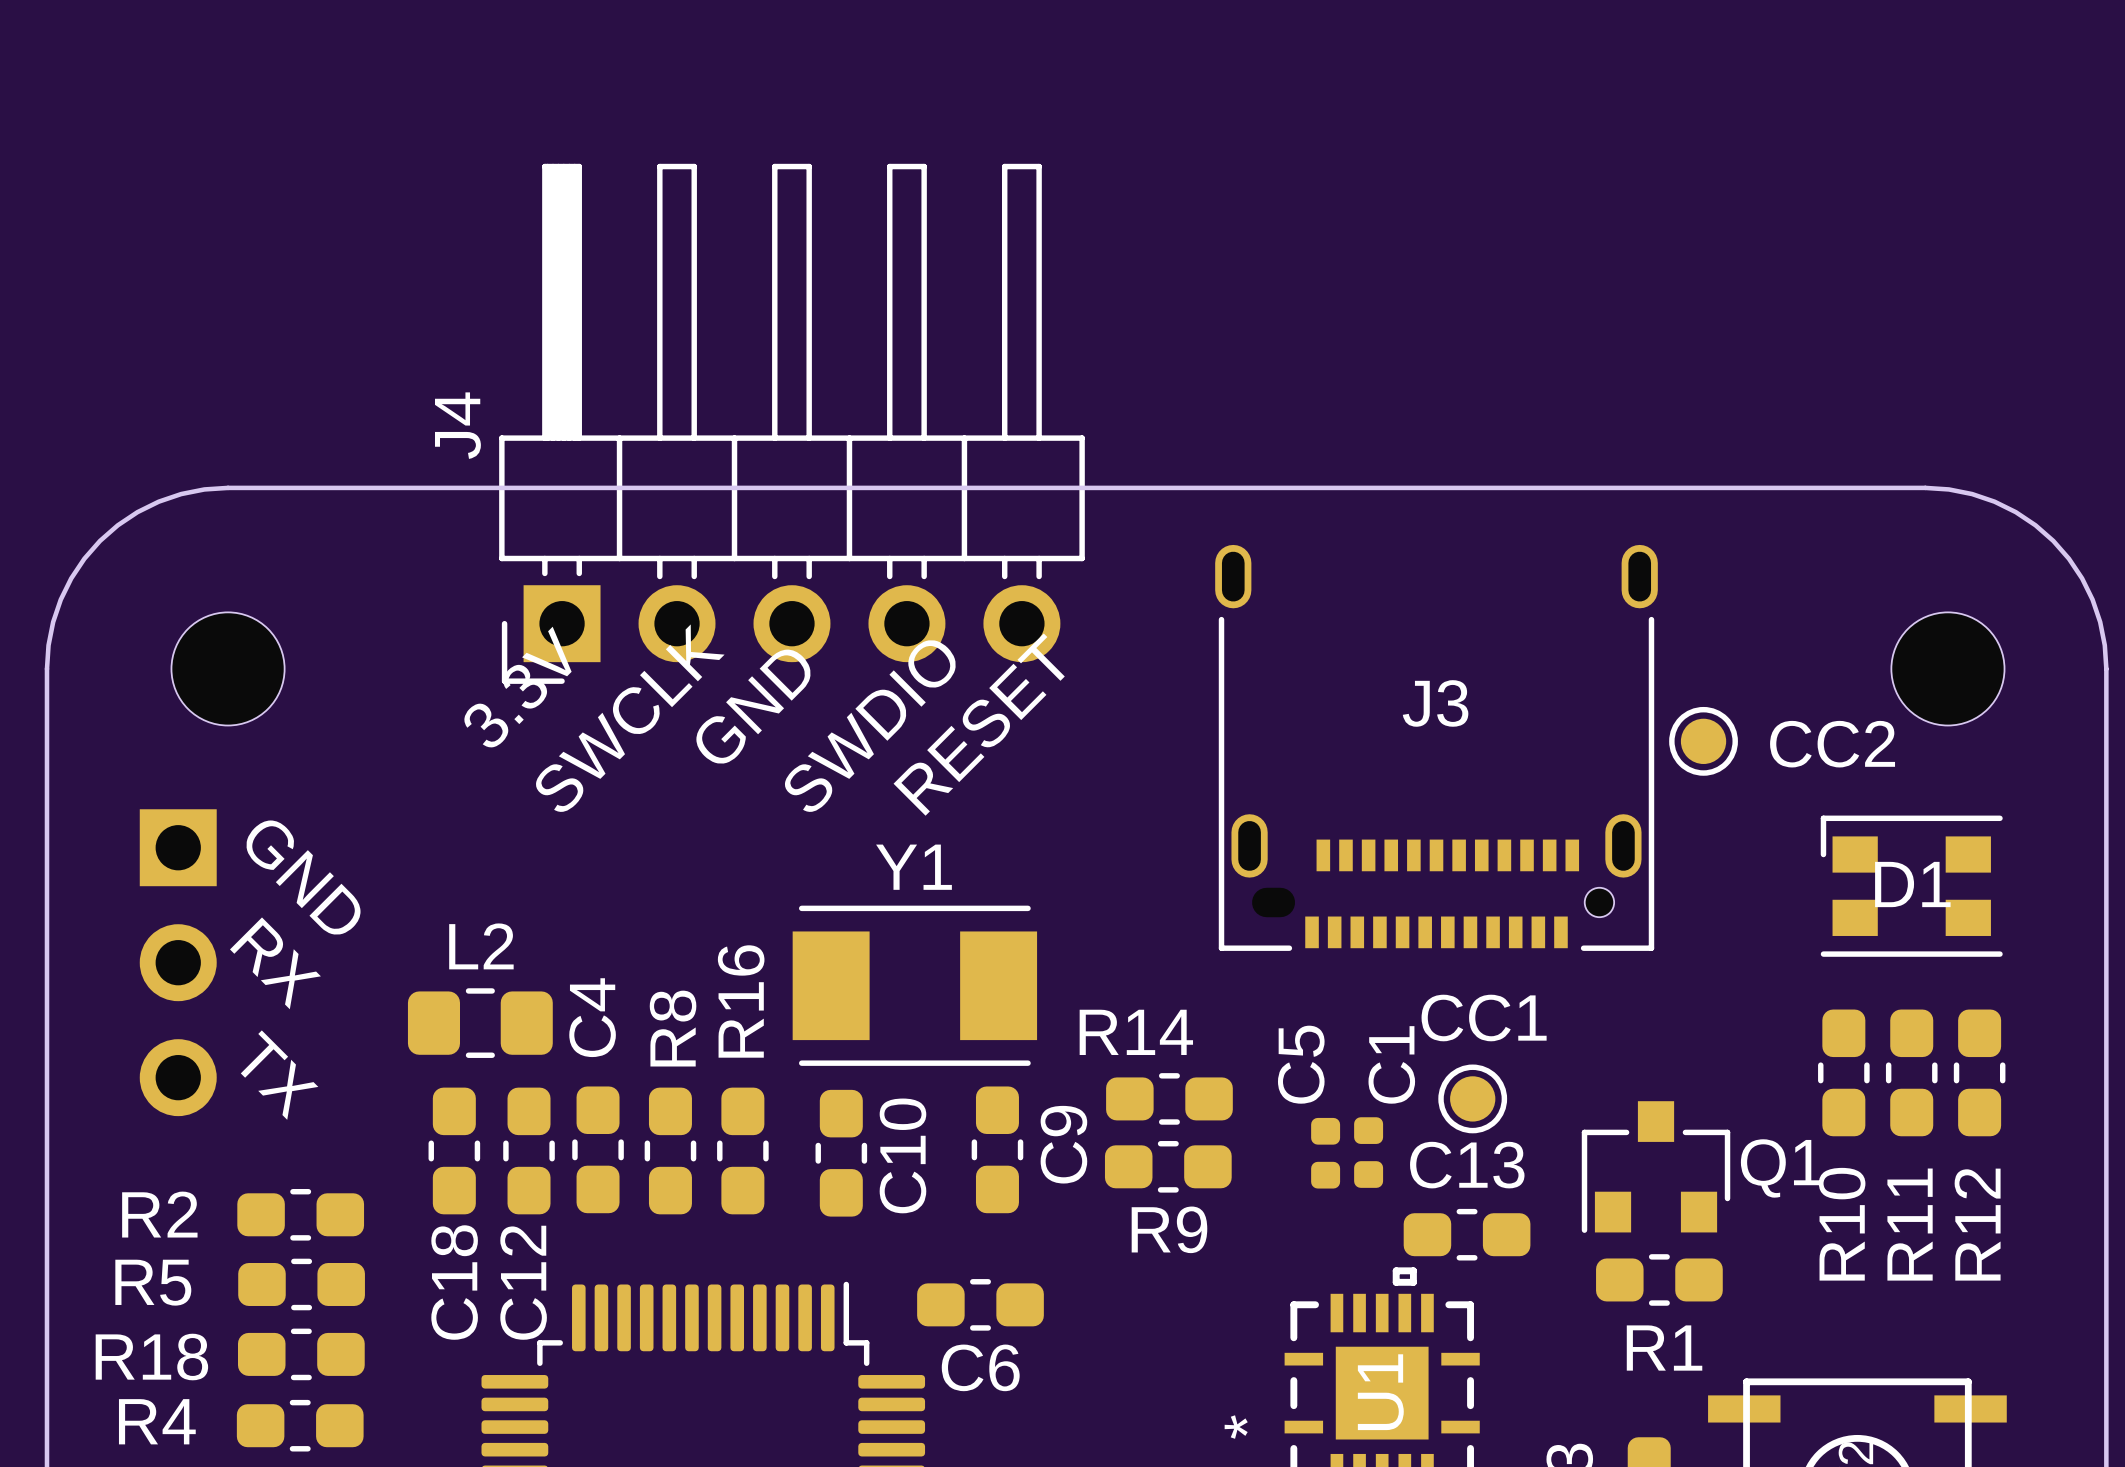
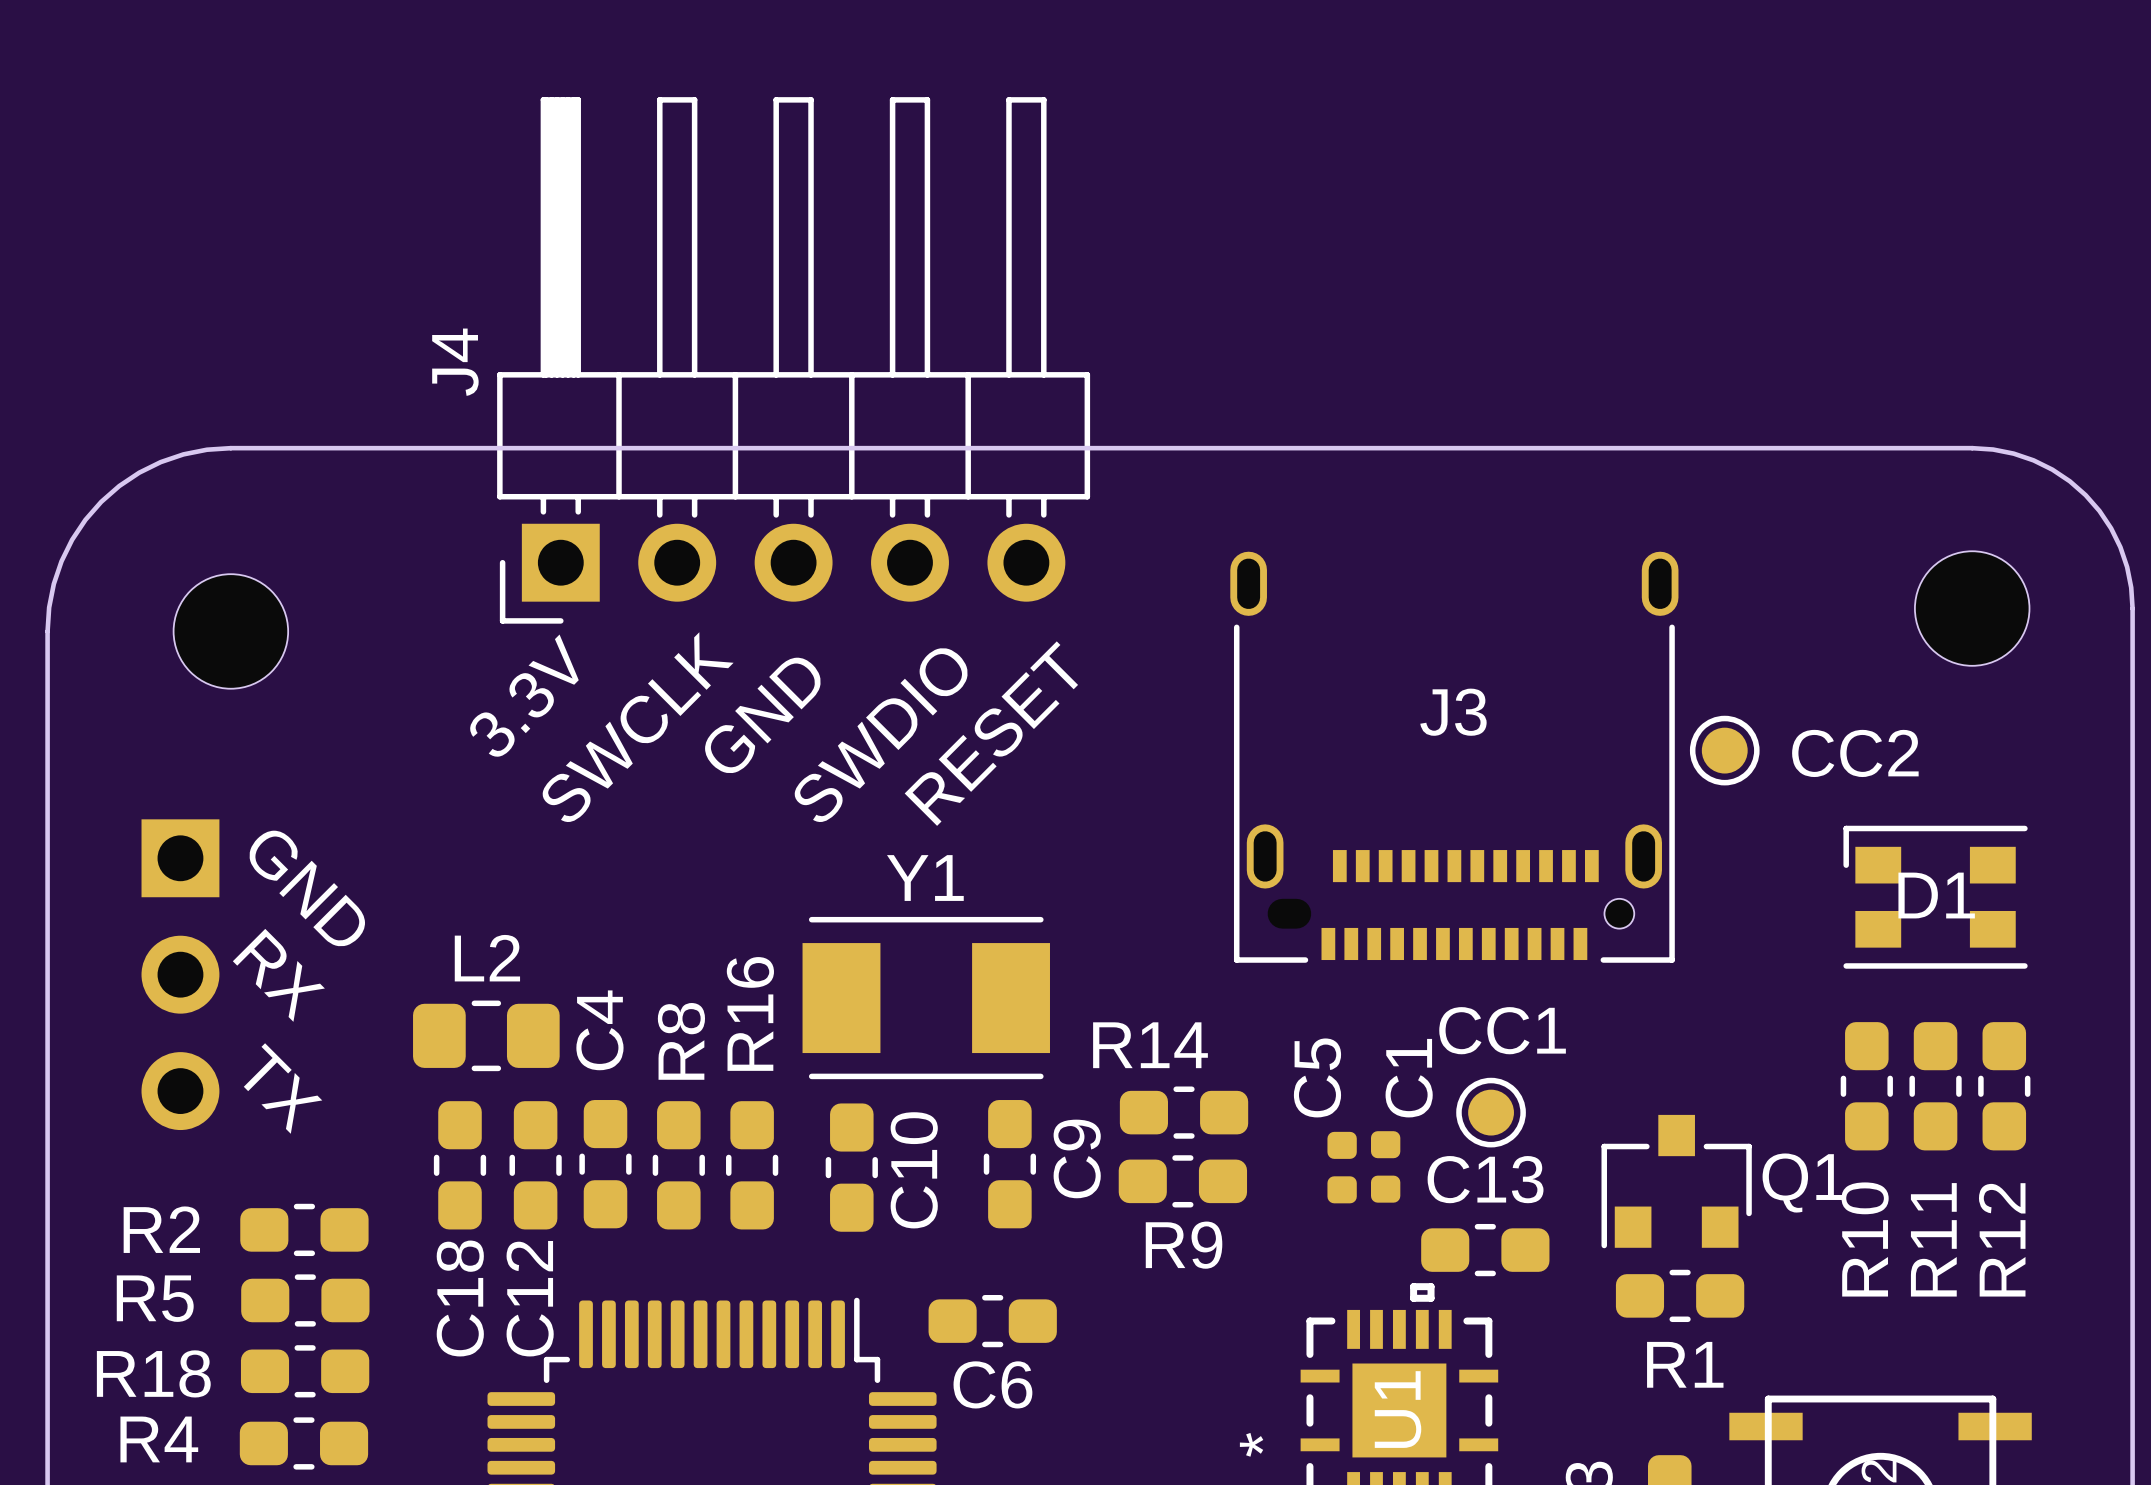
J4 position: (791, 423) -> (793, 360)
board edge: (46, 668) (48, 645) (53, 622) (60, 599) (71, 578) (84, 558) (100, 540) (117, 525) (137, 512) (158, 501) (181, 494) (204, 489) (228, 487) (1925, 487) (1948, 489) (1972, 494) (1994, 501) (2015, 512) (2035, 525) (2053, 540) (2068, 558) (2082, 578) (2092, 599) (2100, 622) (2104, 645) (2106, 668) -> (47, 677) (49, 607) (53, 584) (61, 561) (72, 539) (85, 519) (101, 501) (119, 486) (139, 472) (160, 462) (183, 454) (206, 449) (230, 448) (1993, 449) (2033, 460) (2052, 469) (2085, 495) (2111, 528) (2127, 567) (2131, 587) (2132, 677)
part position: (228, 668) -> (230, 631)
part position: (1947, 668) -> (1972, 608)

